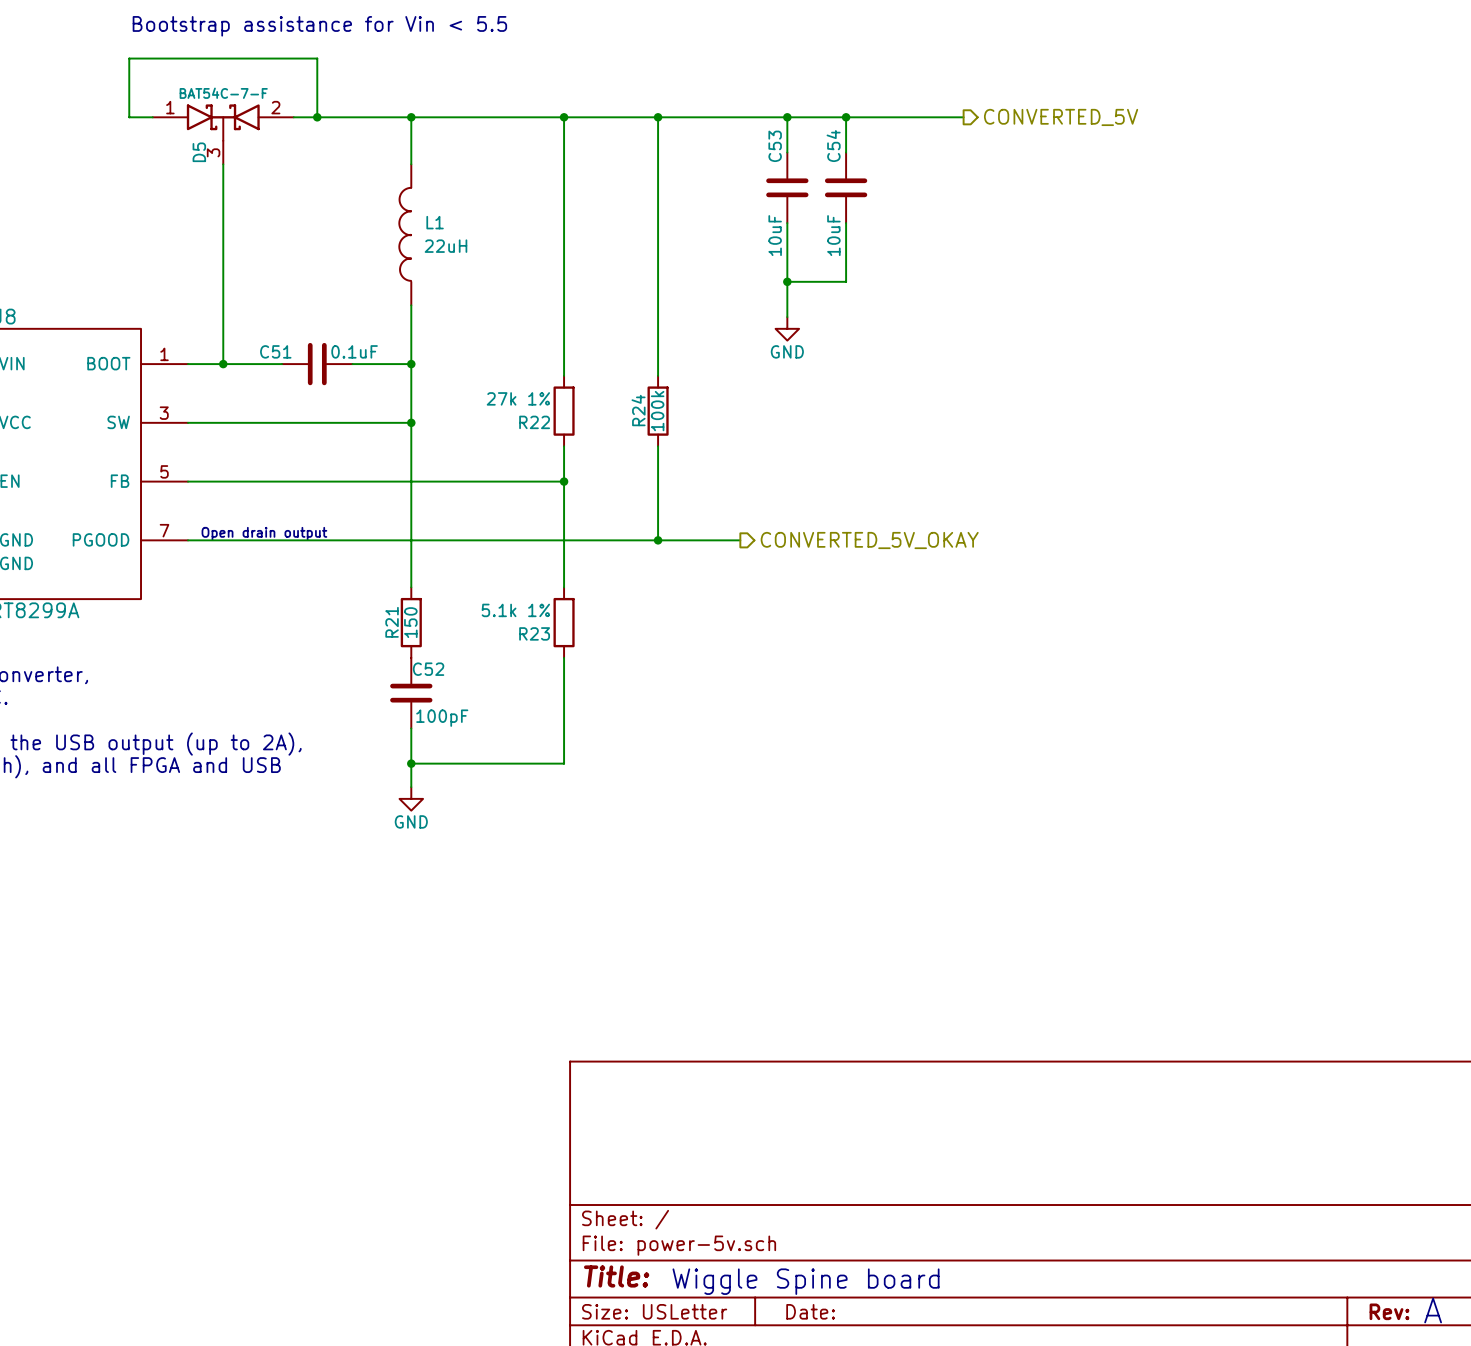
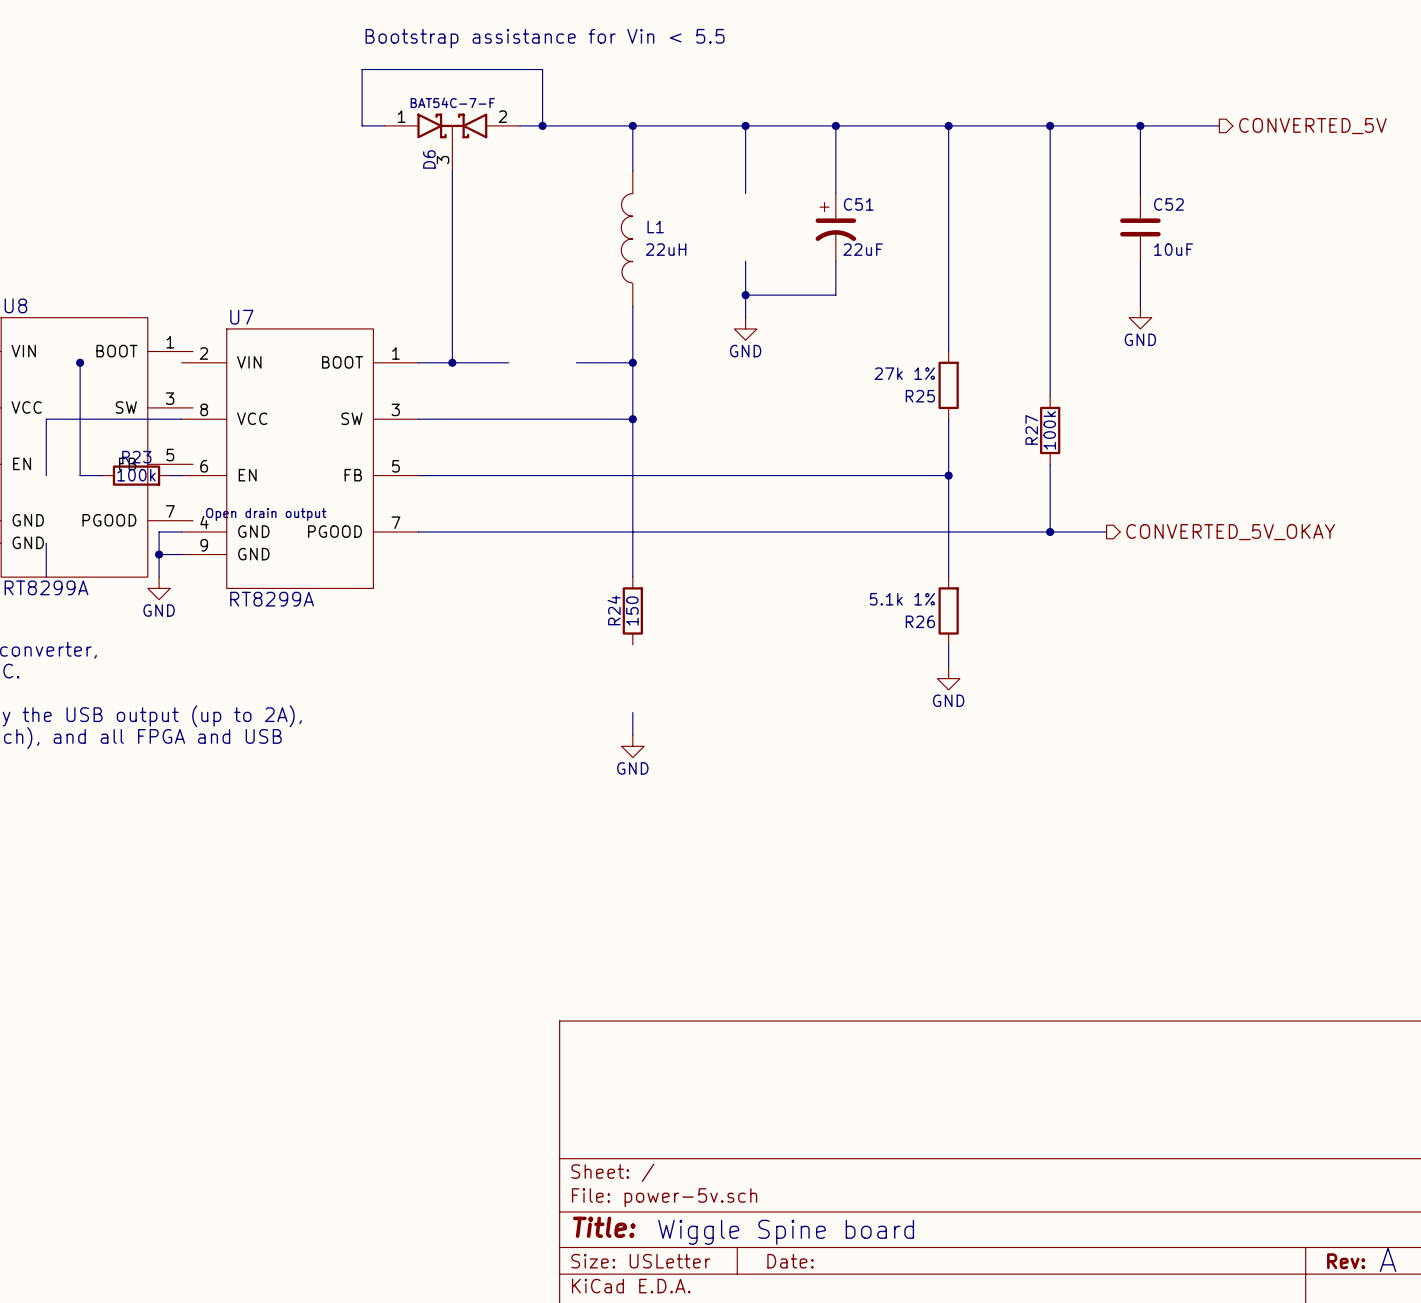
text: Bootstrap assistance for Vin < 5.5 (319, 26) -> none
text: none -> Bootstrap assistance for Vin < 5.5 (545, 38)
wire: (152, 117) (129, 117) (129, 58) (317, 58) (317, 117) -> none
wire: (293, 117) (963, 117) -> none
junction: (317, 117) -> none
wire: (411, 117) (411, 164) -> none
junction: (411, 117) -> none
wire: (564, 117) (564, 375) -> none
junction position: (564, 117) -> (542, 125)
wire: (658, 117) (658, 375) -> none
junction position: (658, 117) -> (632, 125)
wire: (787, 117) (787, 152) -> none
junction position: (787, 117) -> (745, 125)
wire: (846, 117) (846, 152) -> none
junction position: (846, 117) -> (835, 125)
hierarchical label: CONVERTED_5V (1061, 117) -> none
wire: none -> (384, 125) (362, 125) (362, 69) (542, 69) (542, 125)
wire: none -> (520, 125) (1219, 125)
wire: none -> (632, 125) (632, 171)
wire: none -> (745, 125) (745, 193)
wire: none -> (835, 125) (835, 193)
wire: none -> (948, 125) (948, 351)
junction: none -> (948, 125)
wire: none -> (1050, 125) (1050, 396)
junction: none -> (1050, 125)
wire: none -> (1140, 125) (1140, 193)
junction: none -> (1140, 125)
hierarchical label: none -> CONVERTED_5V (1312, 126)
D5: (223, 134) -> none
D6: none -> (452, 142)
wire: (223, 164) (223, 364) -> none
wire: none -> (452, 171) (452, 362)
C53: 10uF (787, 187) -> none
C54: 10uF (846, 187) -> none
wire: (787, 223) (787, 317) -> none
wire: (846, 223) (846, 281) (787, 281) -> none
L1 position: (405, 234) -> (627, 238)
wire: none -> (745, 261) (745, 317)
wire: none -> (835, 261) (835, 295) (745, 295)
wire: none -> (1140, 261) (1140, 306)
junction position: (787, 281) -> (745, 295)
wire: (411, 305) (411, 587) -> none
wire: none -> (632, 306) (632, 577)
power symbol position: GND (787, 328) -> GND (745, 328)
power symbol: none -> GND (1140, 317)
C51 symbol: [282, 342, 353, 386] -> [815, 193, 857, 262]
C51 name position: C51 (275, 351) -> C51 (858, 204)
C51 value: 0.1uF (354, 351) -> 22uF (863, 249)
wire: (188, 364) (282, 364) -> none
junction: (223, 364) -> none
wire: (352, 364) (411, 364) -> none
junction: (411, 364) -> none
wire: none -> (80, 362) (80, 475) (102, 475)
junction: none -> (80, 362)
wire: none -> (418, 362) (508, 362)
junction: none -> (452, 362)
wire: none -> (576, 362) (632, 362)
junction: none -> (632, 362)
R25: none -> 27k 1% (948, 385)
R22: 27k 1% (564, 411) -> none
R24 value: 100k (657, 411) -> 150 (632, 610)
R24 position: (658, 411) -> (632, 610)
wire: (188, 422) (411, 422) -> none
junction: (411, 422) -> none
wire: none -> (181, 419) (46, 419) (46, 475)
wire: none -> (418, 419) (632, 419)
junction: none -> (632, 419)
wire: none -> (948, 419) (948, 577)
wire: (564, 446) (564, 587) -> none
wire: (658, 446) (658, 540) -> none
R27: none -> 100k (1050, 430)
U7: none -> RT8299A (300, 458)
wire: (188, 481) (564, 481) -> none
junction: (564, 481) -> none
wire: none -> (1050, 464) (1050, 531)
wire: none -> (170, 475) (181, 475)
wire: none -> (418, 475) (948, 475)
junction: none -> (948, 475)
wire: (188, 540) (740, 540) -> none
junction: (658, 540) -> none
hierarchical label: CONVERTED_5V_OKAY (869, 540) -> none
wire: none -> (181, 531) (159, 531) (159, 577)
wire: none -> (418, 531) (1106, 531)
junction: none -> (1050, 531)
hierarchical label: none -> CONVERTED_5V_OKAY (1230, 532)
wire: none -> (46, 543) (46, 577)
wire: none -> (159, 554) (181, 554)
junction: none -> (159, 554)
power symbol: none -> GND (159, 588)
R23 value: 5.1k 1% (515, 610) -> 100k (136, 475)
R21: 150 (411, 622) -> none
R23 rotation: 0° (564, 622) -> 90° clockwise (136, 475)
R23 position: (564, 622) -> (136, 475)
R26: none -> 5.1k 1% (948, 610)
wire: (564, 657) (564, 763) (411, 763) -> none
C52 name position: C52 (428, 669) -> C52 (1168, 204)
wire: none -> (948, 644) (948, 667)
C52 position: (411, 693) -> (1140, 227)
power symbol: none -> GND (948, 678)
C52 value: 100pF (442, 718) -> 10uF (1173, 249)
wire: (411, 728) (411, 787) -> none
wire: none -> (632, 712) (632, 735)
junction: (411, 763) -> none
power symbol: none -> GND (632, 746)
power symbol: GND (411, 798) -> none

